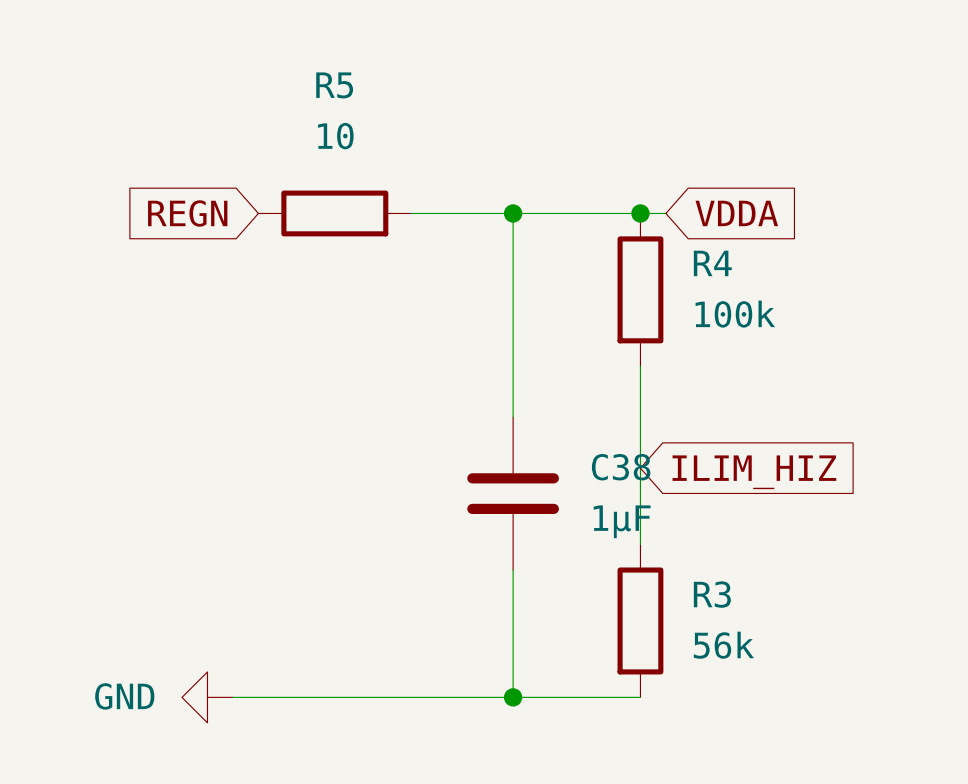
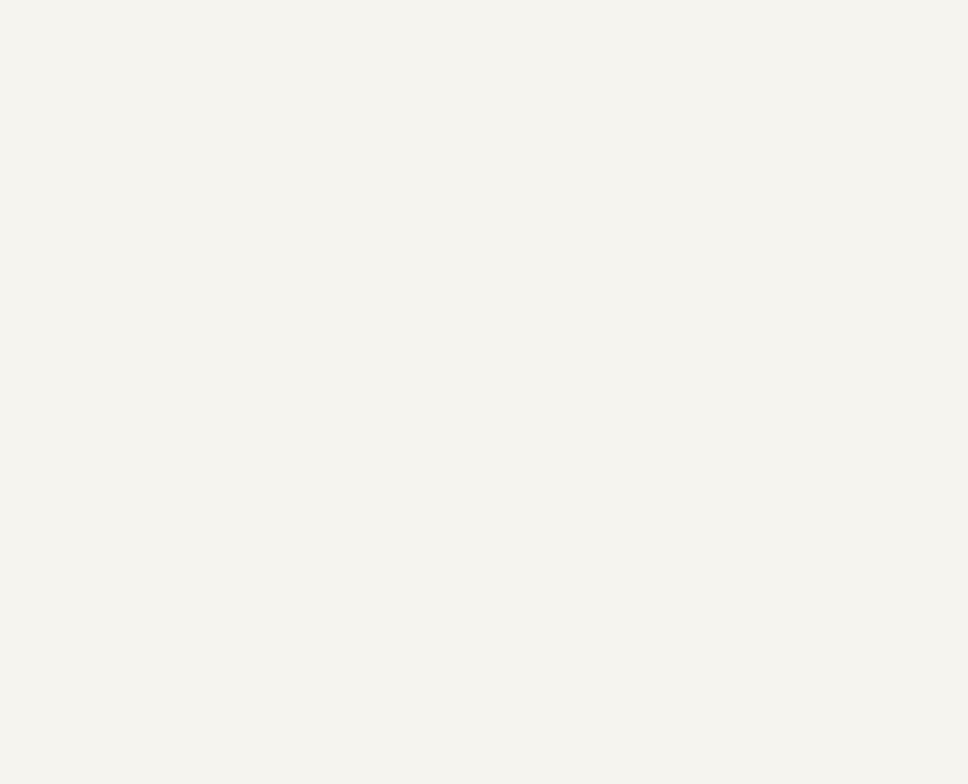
global label: REGN (187, 213) -> none
R5: 10 (334, 213) -> none
wire: (411, 213) (665, 213) -> none
wire: (513, 213) (513, 417) -> none
junction: (513, 213) -> none
junction: (640, 213) -> none
global label: VDDA (736, 213) -> none
R4: 100k (640, 289) -> none
wire: (640, 366) (640, 544) -> none
global label: ILIM_HIZ (754, 472) -> none
C38: 1µF (513, 493) -> none
wire: (513, 570) (513, 697) -> none
R3: 56k (640, 620) -> none
power symbol: GND (207, 697) -> none
wire: (232, 697) (640, 697) -> none
junction: (513, 697) -> none

